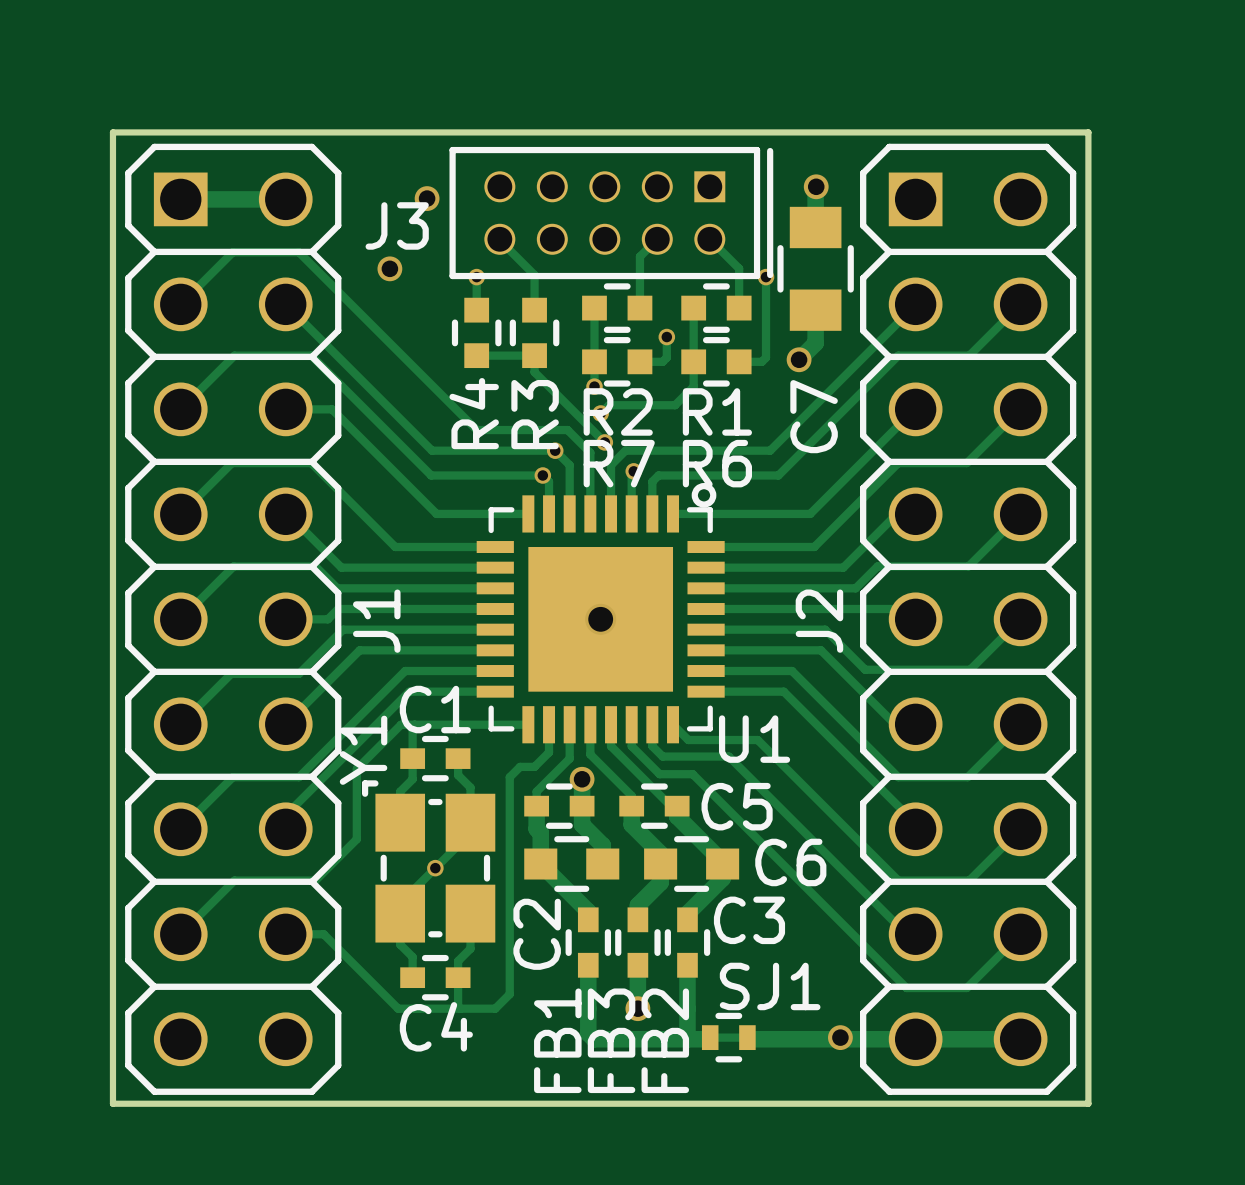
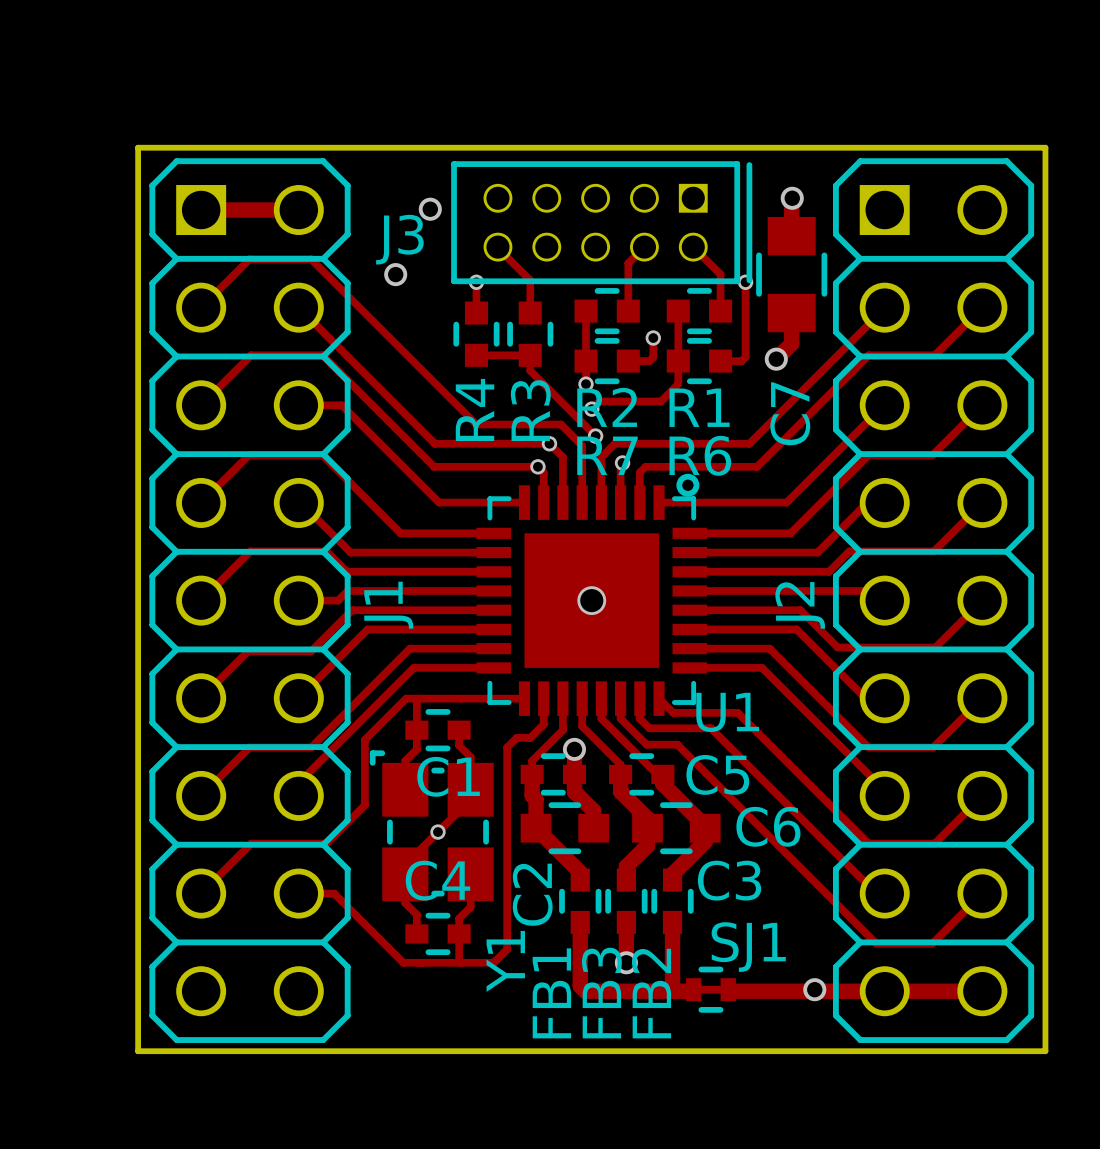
C1 name position: C1 (435, 709) -> C1 (448, 776)
Y1 name position: Y1 (363, 750) -> Y1 (505, 961)
C4 name position: C4 (436, 1026) -> C4 (437, 880)

